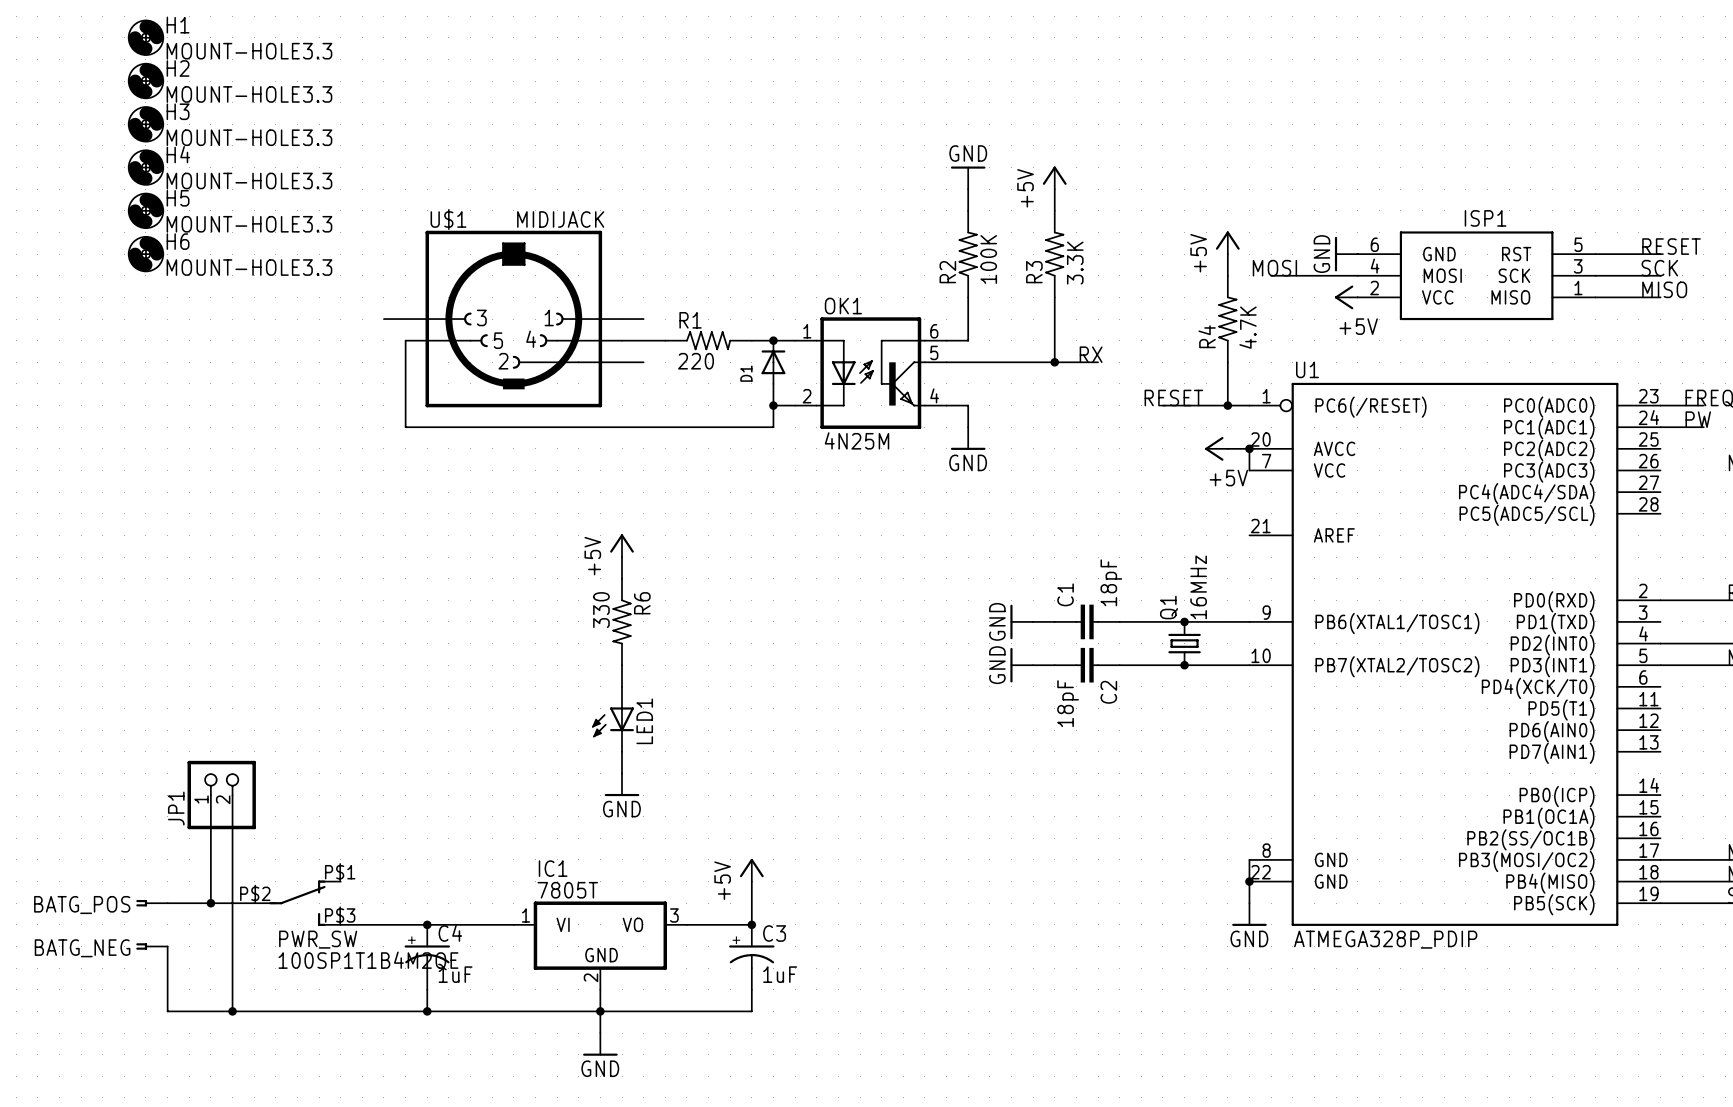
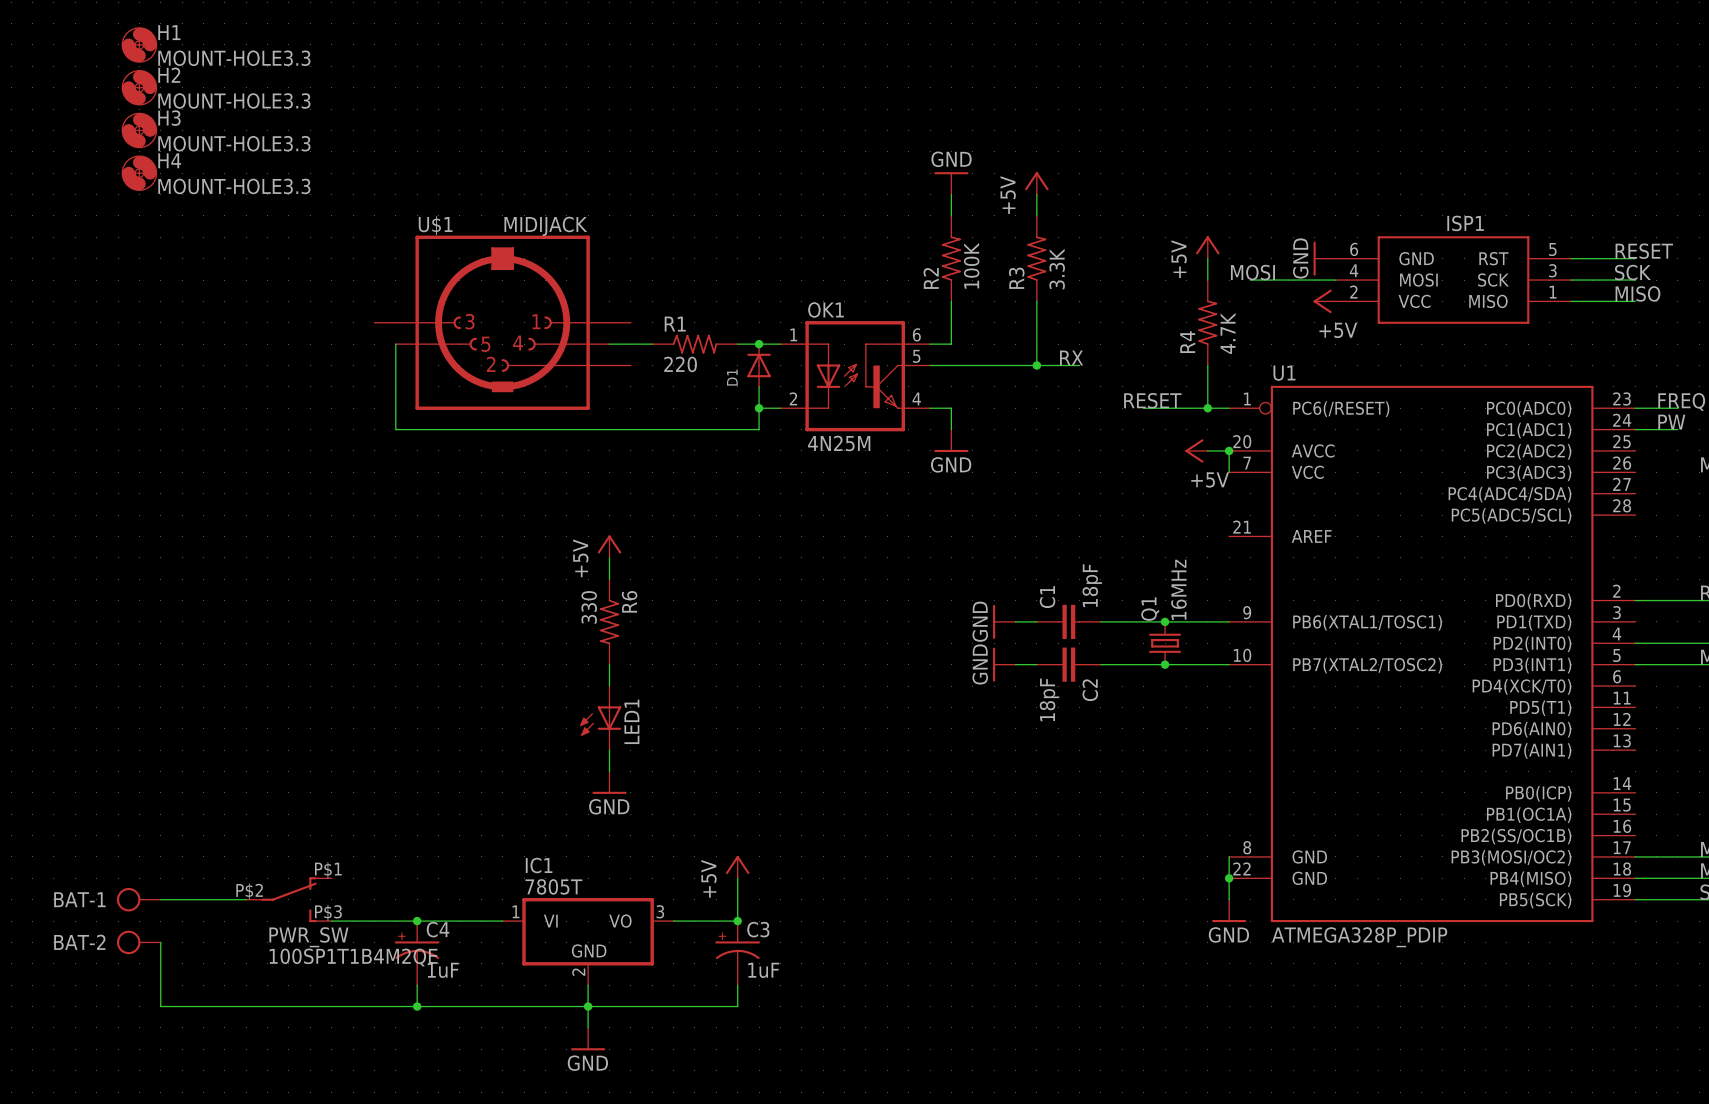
H5: MOUNT-HOLE3.3 (145, 210) -> none
H6: MOUNT-HOLE3.3 (145, 254) -> none
wire: (210, 795) (210, 903) -> none
JP1: (221, 795) -> none
wire: (232, 795) (232, 1011) -> none
BAT-1: none -> (138, 899)
BATG_POS: (151, 903) -> none
junction: (210, 903) -> none
BAT-2: none -> (138, 942)
BATG_NEG: (151, 946) -> none
junction: (232, 1011) -> none

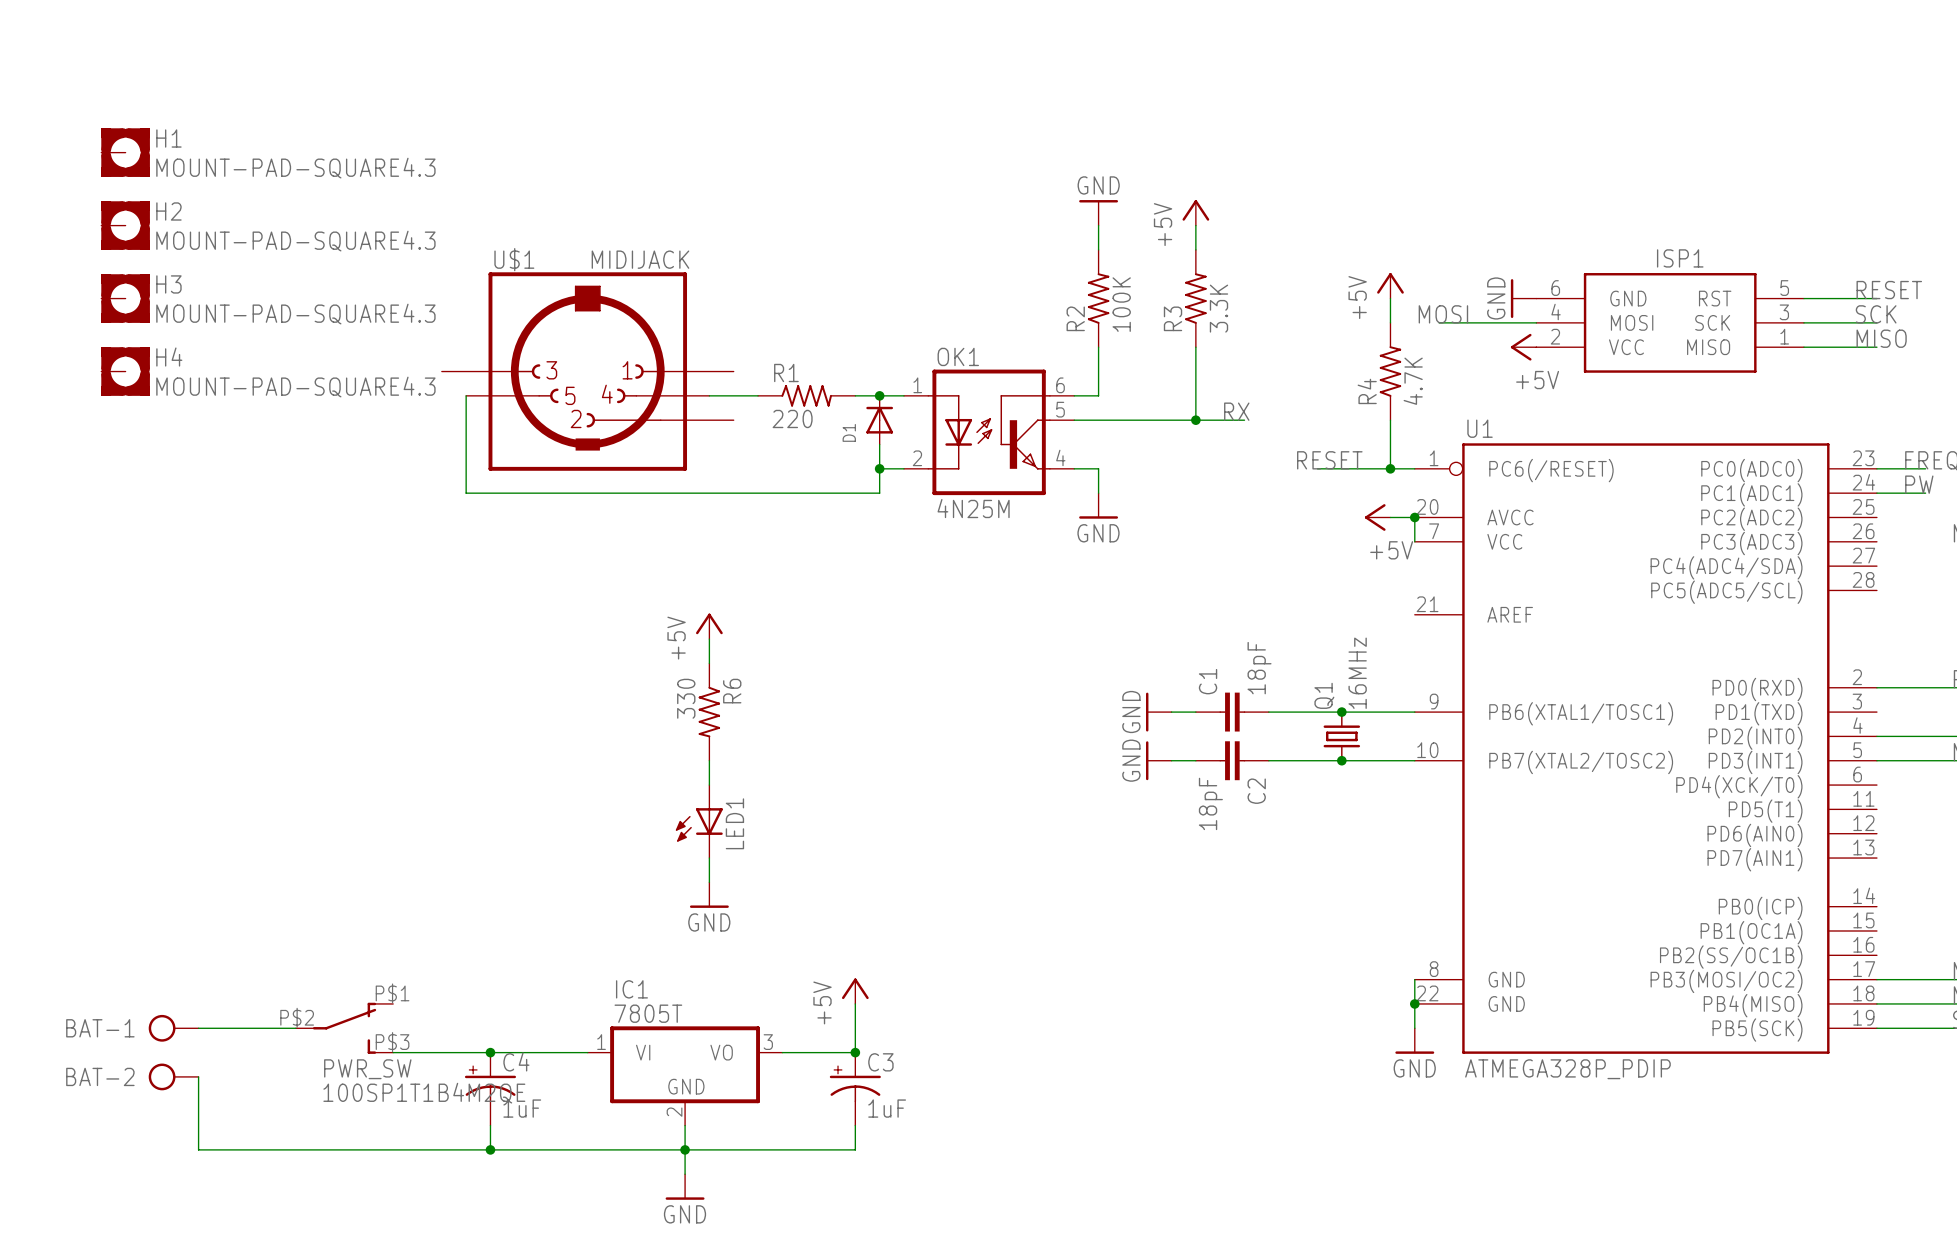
H1 symbol: [122, 27, 157, 63] -> [101, 128, 150, 177]
H1 value: MOUNT-HOLE3.3 (234, 58) -> MOUNT-PAD-SQUARE4.3 (295, 168)
H2 symbol: [122, 70, 157, 106] -> [101, 201, 150, 250]
H2 value: MOUNT-HOLE3.3 (234, 100) -> MOUNT-PAD-SQUARE4.3 (295, 241)
H3 symbol: [122, 113, 157, 148] -> [101, 274, 150, 323]
H3 value: MOUNT-HOLE3.3 (234, 143) -> MOUNT-PAD-SQUARE4.3 (295, 314)
H4 symbol: [122, 155, 157, 191] -> [101, 347, 150, 396]
H4 value: MOUNT-HOLE3.3 (234, 186) -> MOUNT-PAD-SQUARE4.3 (295, 387)

